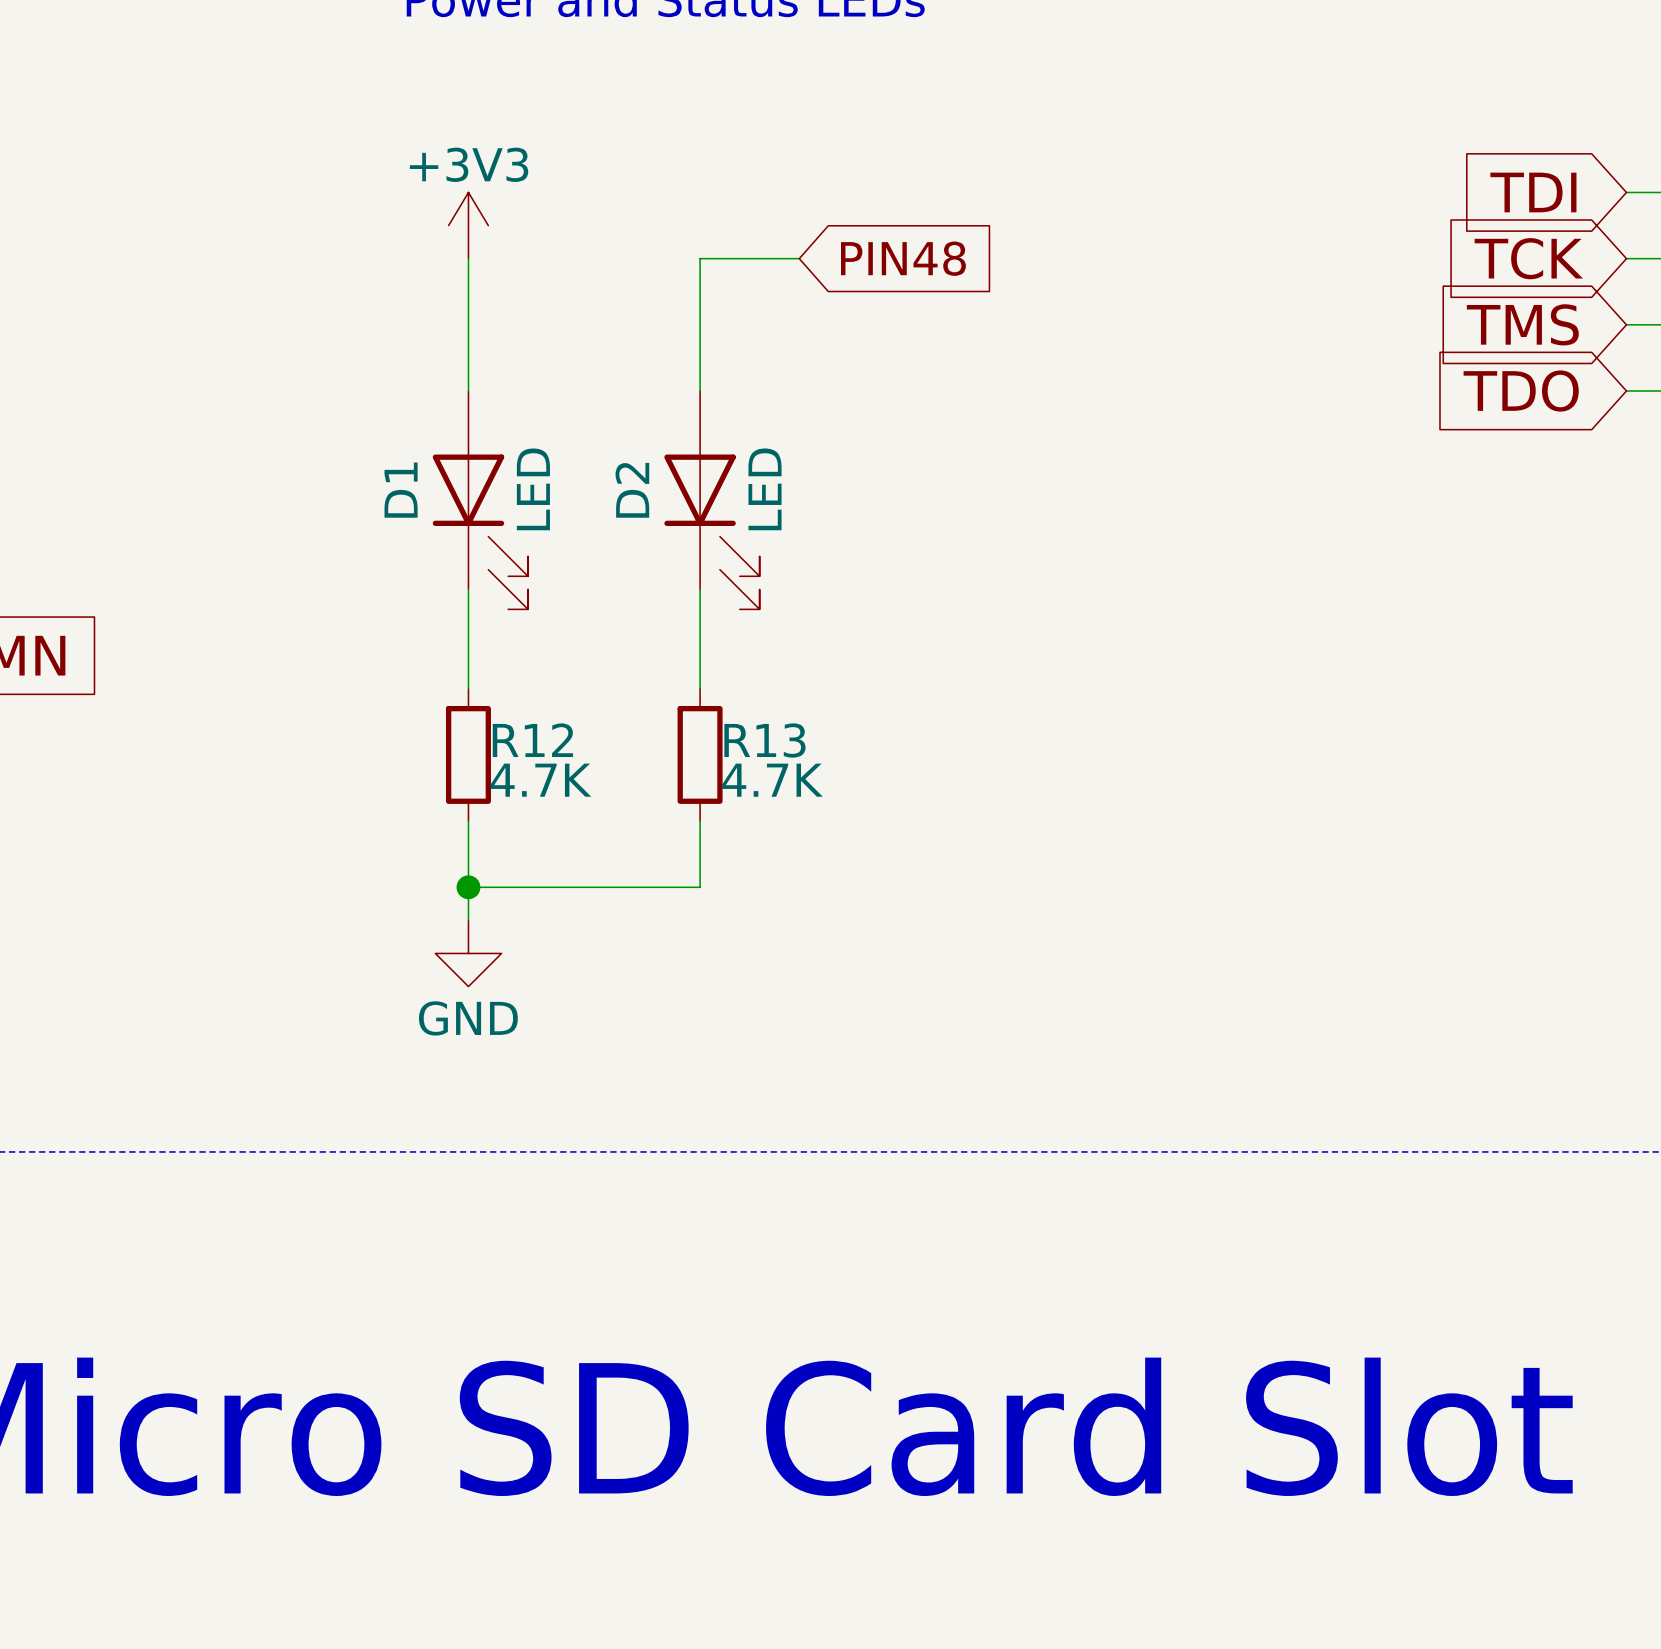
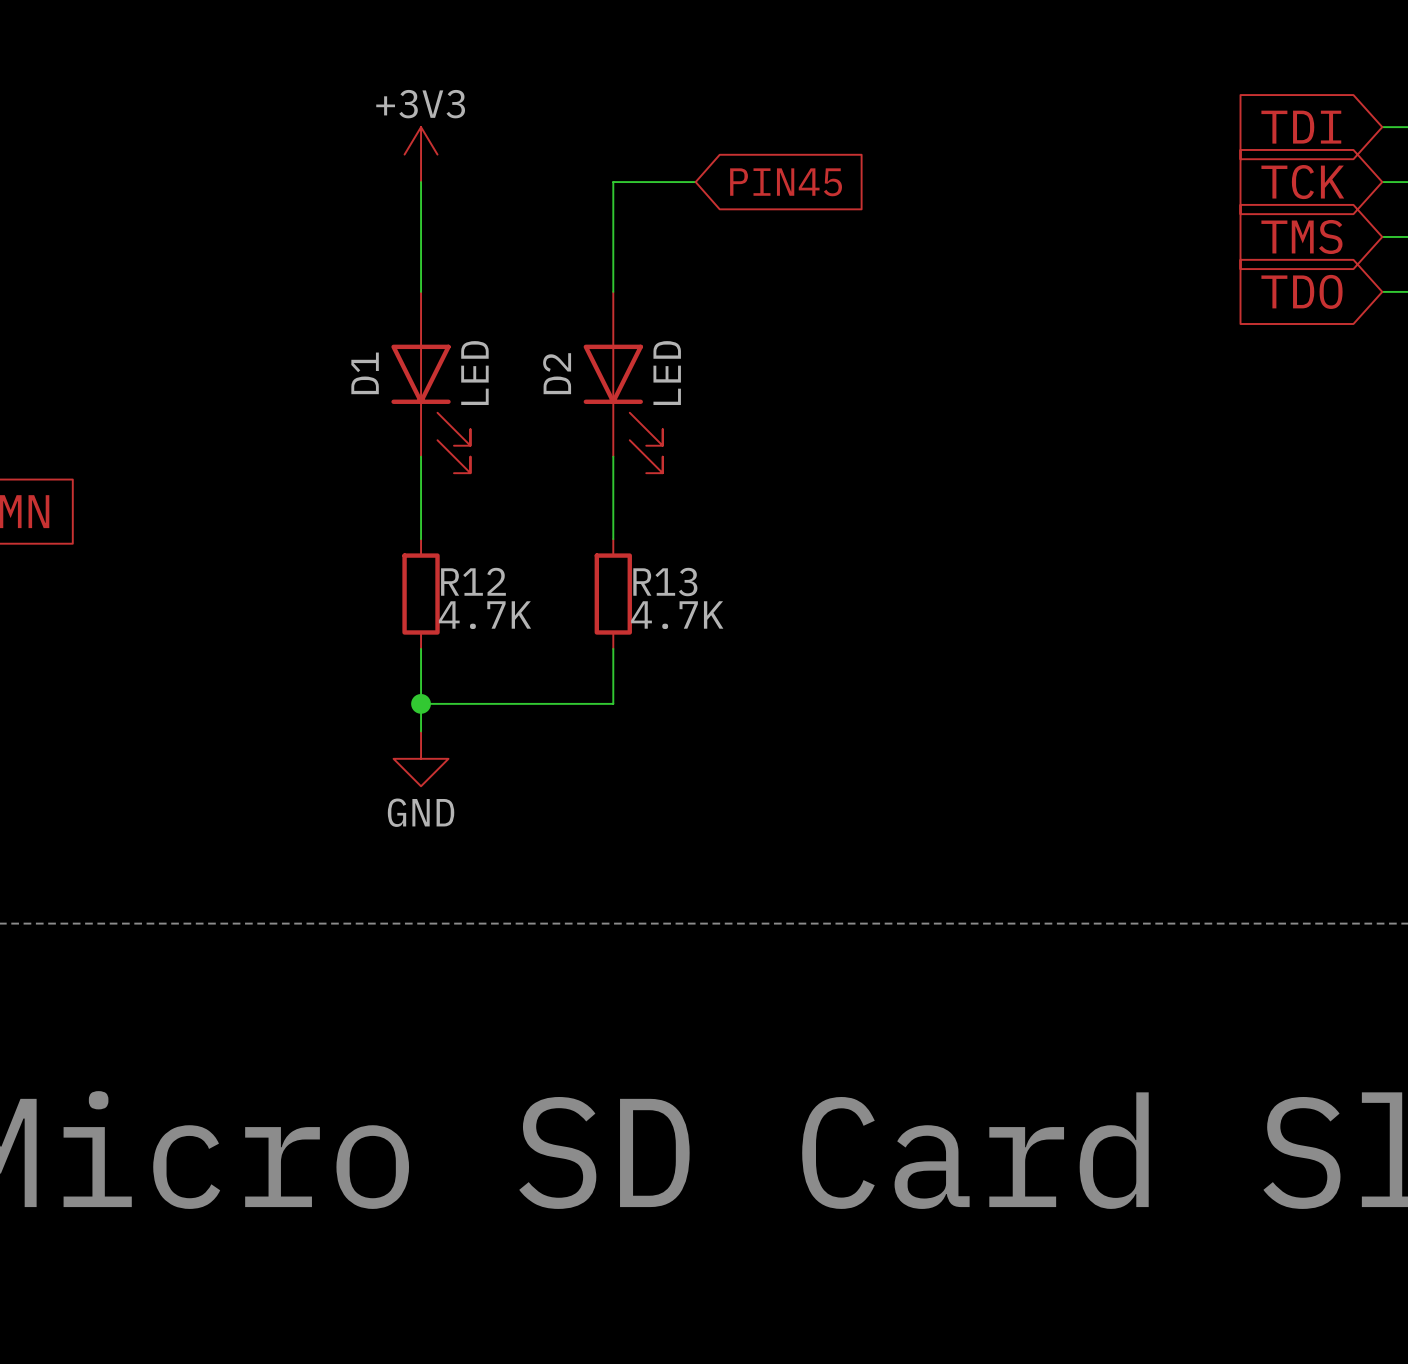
global label: PIN48 (903, 258) -> PIN45 (786, 182)

